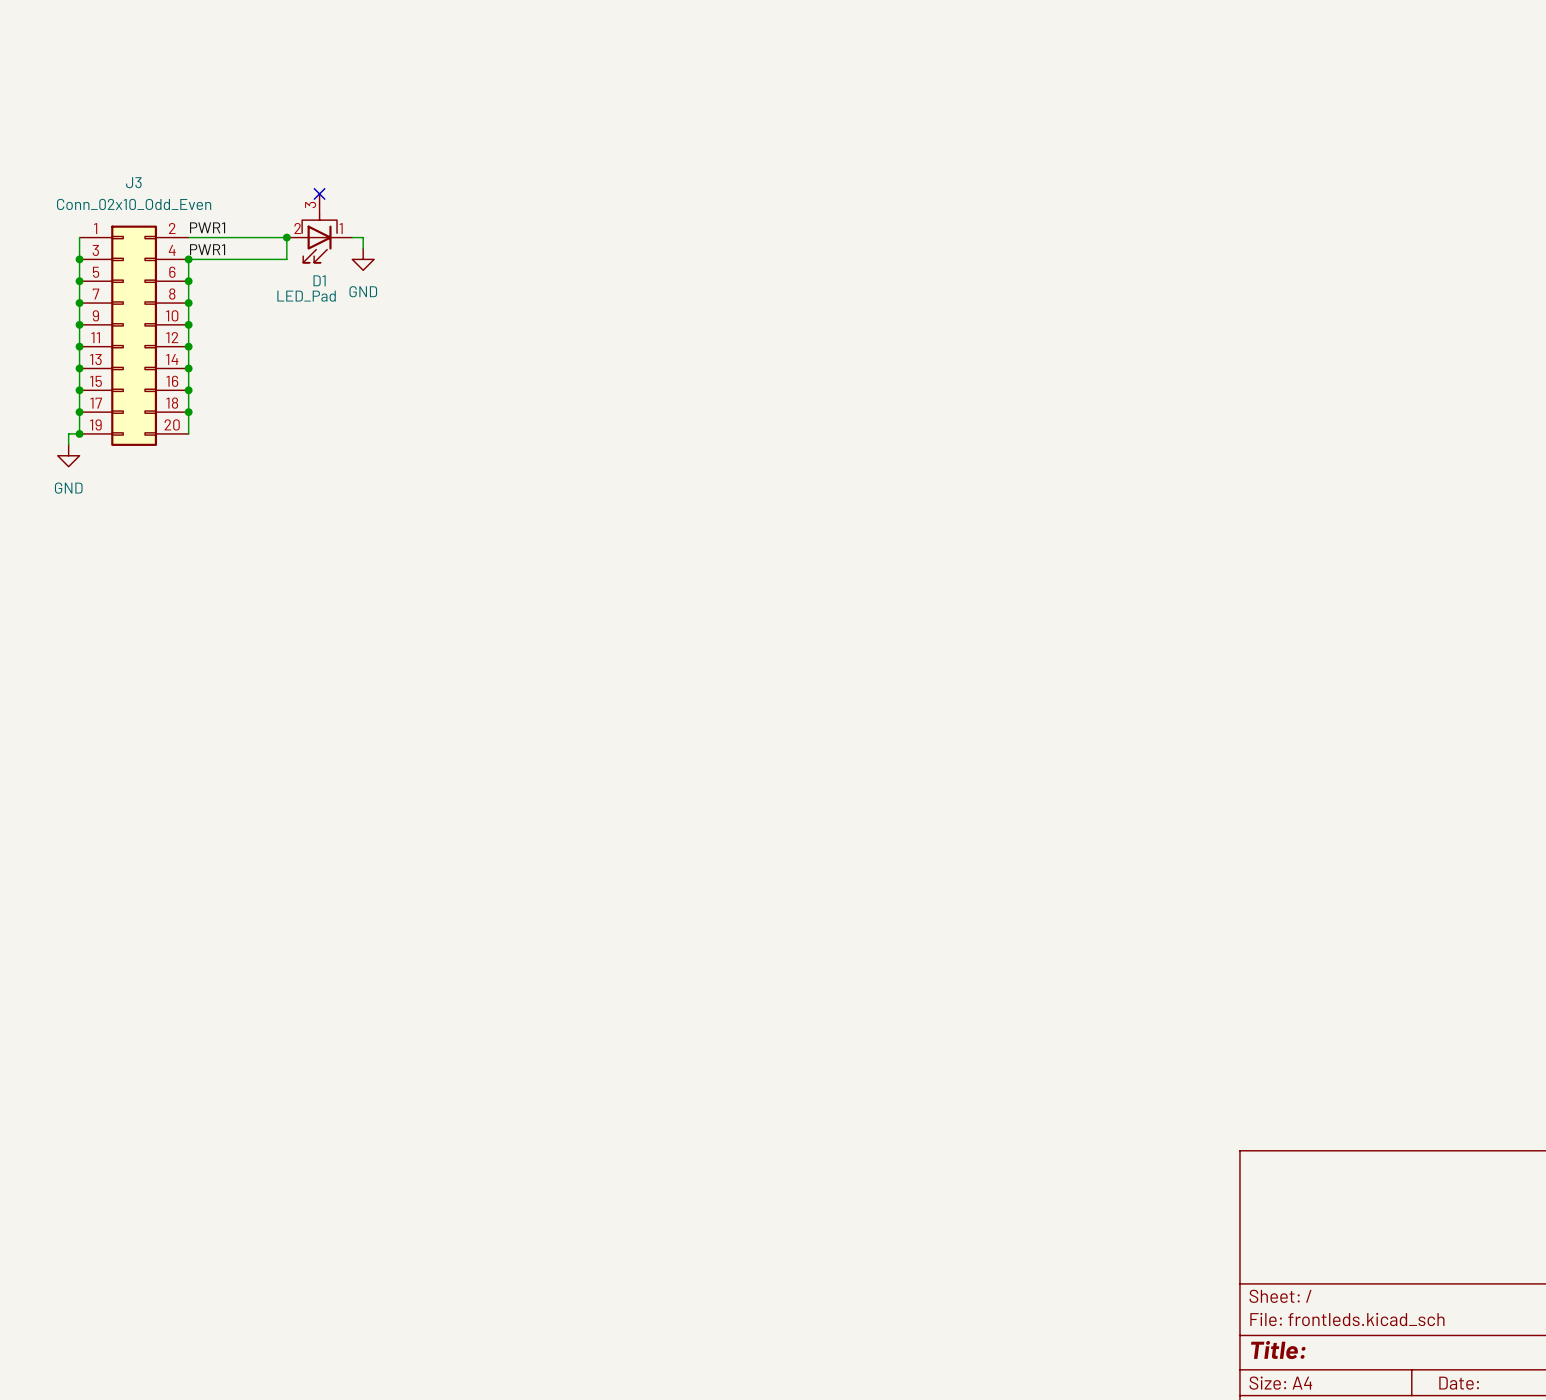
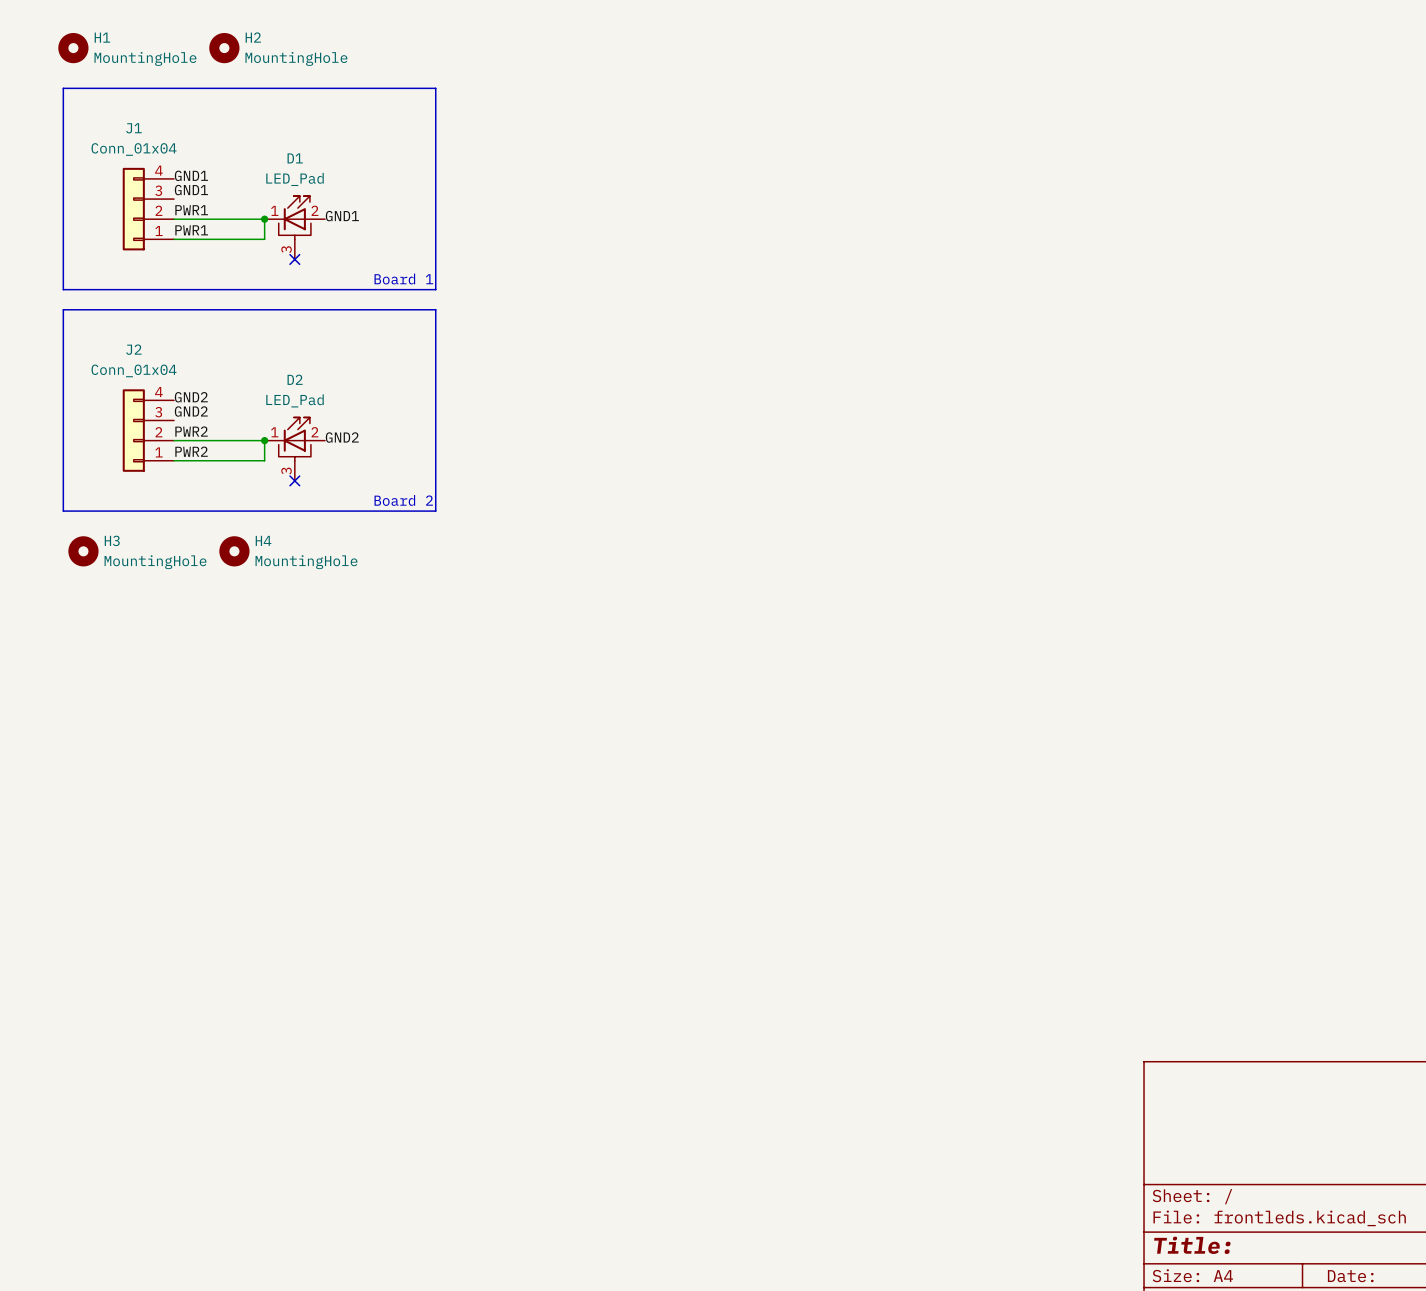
H1: none -> MountingHole (73, 48)
H2: none -> MountingHole (224, 48)
line: none -> (63, 88) (435, 88) (435, 289) (63, 289) (63, 88)
label: none -> GND1 (191, 175)
no-connect mark: (319, 193) -> none
label: none -> GND1 (191, 190)
J1: none -> Conn_01x04 (148, 209)
label: none -> GND1 (342, 216)
wire: (79, 237) (79, 433) (68, 433) (68, 444) -> none
wire: (352, 237) (363, 237) (363, 248) -> none
D1 rotation: 0° (319, 239) -> 180° (294, 217)
junction: (79, 259) -> none
wire: (188, 259) (188, 433) -> none
junction: (188, 259) -> none
power symbol: GND (363, 259) -> none
D1 name position: D1 (319, 280) -> D1 (295, 158)
junction: (79, 281) -> none
junction: (188, 281) -> none
no-connect mark: none -> (294, 259)
D1 value position: LED_Pad (306, 296) -> LED_Pad (295, 179)
text: none -> Board 1 (403, 279)
junction: (79, 303) -> none
junction: (188, 303) -> none
junction: (79, 324) -> none
junction: (188, 324) -> none
line: none -> (63, 309) (63, 511) (435, 511) (435, 309) (63, 309)
J3: Conn_02x10_Odd_Even (134, 335) -> none
junction: (79, 346) -> none
junction: (188, 346) -> none
junction: (79, 368) -> none
junction: (188, 368) -> none
junction: (79, 390) -> none
junction: (188, 390) -> none
junction: (79, 412) -> none
junction: (188, 412) -> none
label: none -> GND2 (191, 397)
junction: (79, 433) -> none
label: none -> GND2 (191, 411)
power symbol: GND (68, 455) -> none
J2: none -> Conn_01x04 (148, 430)
label: none -> PWR2 (191, 431)
label: none -> GND2 (342, 437)
wire: none -> (174, 440) (264, 440) (264, 460) (174, 460)
junction: none -> (264, 440)
D2: none -> LED_Pad (294, 449)
label: none -> PWR2 (191, 451)
no-connect mark: none -> (294, 480)
text: none -> Board 2 (403, 500)
H3: none -> MountingHole (83, 551)
H4: none -> MountingHole (234, 551)

